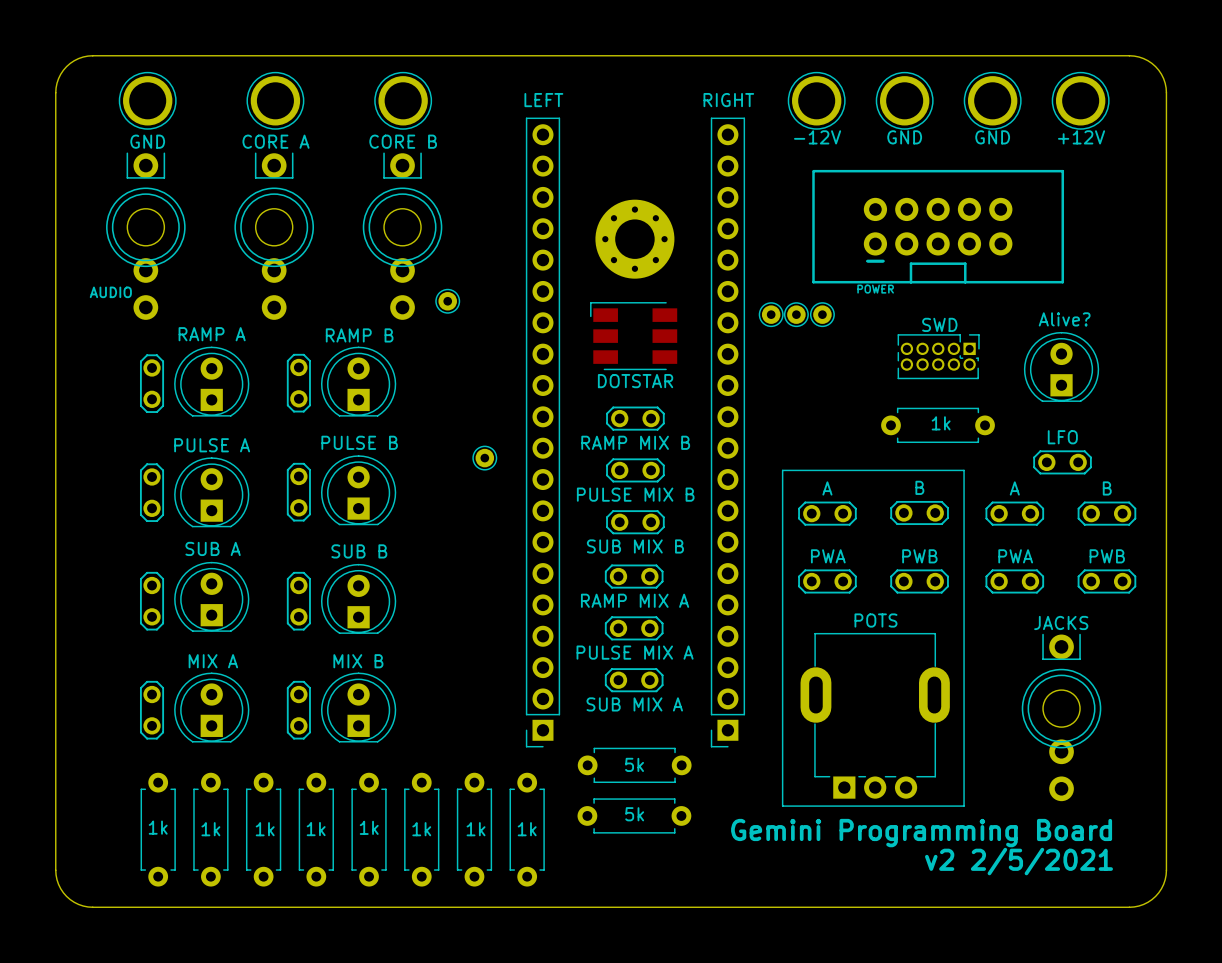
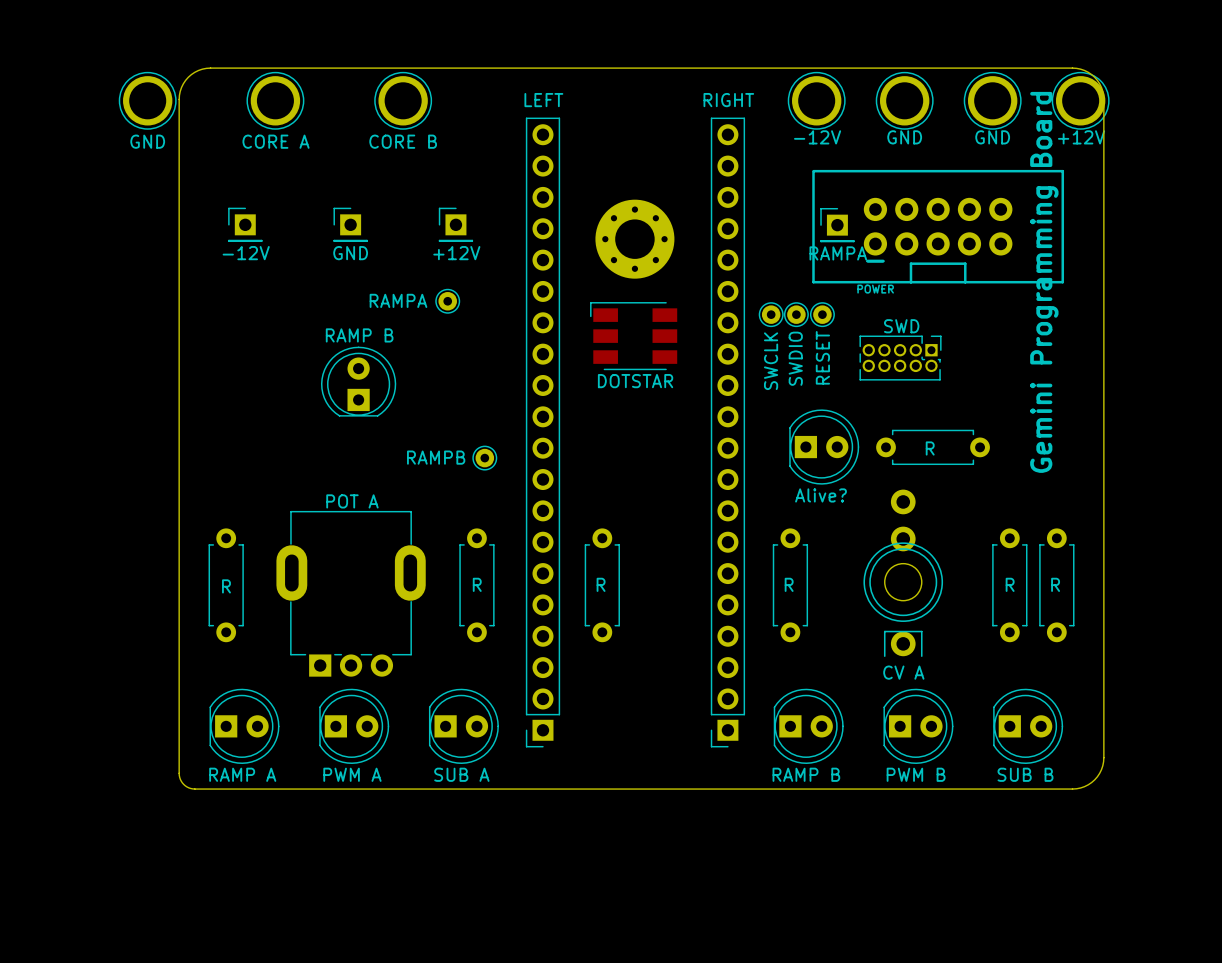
board edge: (92, 55) (1129, 55) (1138, 57) (1151, 63) (1163, 78) (1166, 92) (1166, 870) (1165, 879) (1158, 892) (1143, 904) (1129, 907) (92, 907) (83, 906) (70, 899) (58, 884) (55, 870) (55, 92) (58, 78) (66, 66) (78, 58) (92, 55) -> (210, 68) (198, 70) (188, 77) (181, 87) (179, 99) (179, 773) (181, 781) (185, 785) (194, 789) (1072, 789) (1088, 784) (1097, 776) (1102, 765) (1103, 757) (1103, 99) (1099, 83) (1091, 74) (1080, 69) (1072, 68) (210, 68)
part: none -> -12V (245, 224)
part: none -> GND (350, 224)
part: none -> +12V (455, 224)
part: none -> RAMPA (837, 225)
part: AUDIO (145, 236) -> none
part: (274, 236) -> none
part: (402, 236) -> none
text: none -> Gemini Programming Board (1044, 282)
part value: none -> RAMPA (398, 300)
part value position: Alive? (1064, 319) -> Alive? (820, 495)
part position: (938, 356) -> (900, 358)
part value: none -> RESET (822, 357)
part value: none -> SWDIO (795, 358)
part value: none -> SWCLK (771, 361)
part rotation: 0° (1061, 366) -> 90° clockwise (824, 447)
part position: (1061, 366) -> (824, 447)
part: RAMP A (211, 381) -> none
part: (152, 383) -> none
part: (298, 383) -> none
part: RAMP MIX B (635, 418) -> none
part: 1k (938, 425) -> none
part: none -> R (933, 447)
part value: none -> RAMPB (436, 457)
part: LFO (1062, 462) -> none
part: PULSE MIX B (635, 470) -> none
line: (782, 470) (782, 806) (964, 806) (964, 470) (782, 470) -> none
part: PULSE B (358, 490) -> none
part: (152, 492) -> none
part: PULSE A (211, 492) -> none
part: (298, 492) -> none
part: B (919, 512) -> none
part: A (827, 513) -> none
part: A (1014, 513) -> none
part: B (1106, 513) -> none
part: SUB MIX B (635, 522) -> none
part value position: SUB A (213, 548) -> SUB A (461, 774)
part value: SUB B (359, 551) -> POT A (352, 501)
part value: PWA (1015, 556) -> R (1010, 584)
part footprint: [320, 563, 397, 634] -> [276, 510, 426, 677]
part footprint: [985, 569, 1045, 594] -> [992, 528, 1028, 643]
part: none -> CV A (903, 573)
part: RAMP MIX A (634, 576) -> none
part: PWA (827, 581) -> none
part: PWB (919, 581) -> none
part: PWB (1106, 581) -> none
part: none -> R (226, 585)
part: none -> R (476, 585)
part: none -> R (602, 585)
part: none -> R (790, 585)
part: none -> R (1056, 585)
part rotation: 0° (211, 596) -> 90° clockwise (463, 726)
part position: (211, 596) -> (463, 726)
part: (152, 601) -> none
part: (298, 601) -> none
part: PULSE MIX A (634, 628) -> none
part: SUB MIX A (634, 680) -> none
part: MIX A (211, 707) -> none
part: MIX B (358, 707) -> none
part: (152, 710) -> none
part: (298, 710) -> none
part: POTS (875, 715) -> none
part: JACKS (1061, 717) -> none
part: none -> RAMP A (244, 726)
part: none -> PWM A (354, 726)
part: none -> RAMP B (808, 726)
part: none -> PWM B (918, 726)
part: none -> SUB B (1028, 726)
part: 5k (634, 765) -> none
part: 5k (634, 815) -> none
part: 1k (158, 829) -> none
part: 1k (210, 829) -> none
part: 1k (263, 829) -> none
part: 1k (316, 829) -> none
part: 1k (369, 829) -> none
part: 1k (421, 829) -> none
part: 1k (474, 829) -> none
part: 1k (527, 829) -> none
text: Gemini Programming Board (921, 833) -> none
text: v2 2/5/2021 (1018, 861) -> none

